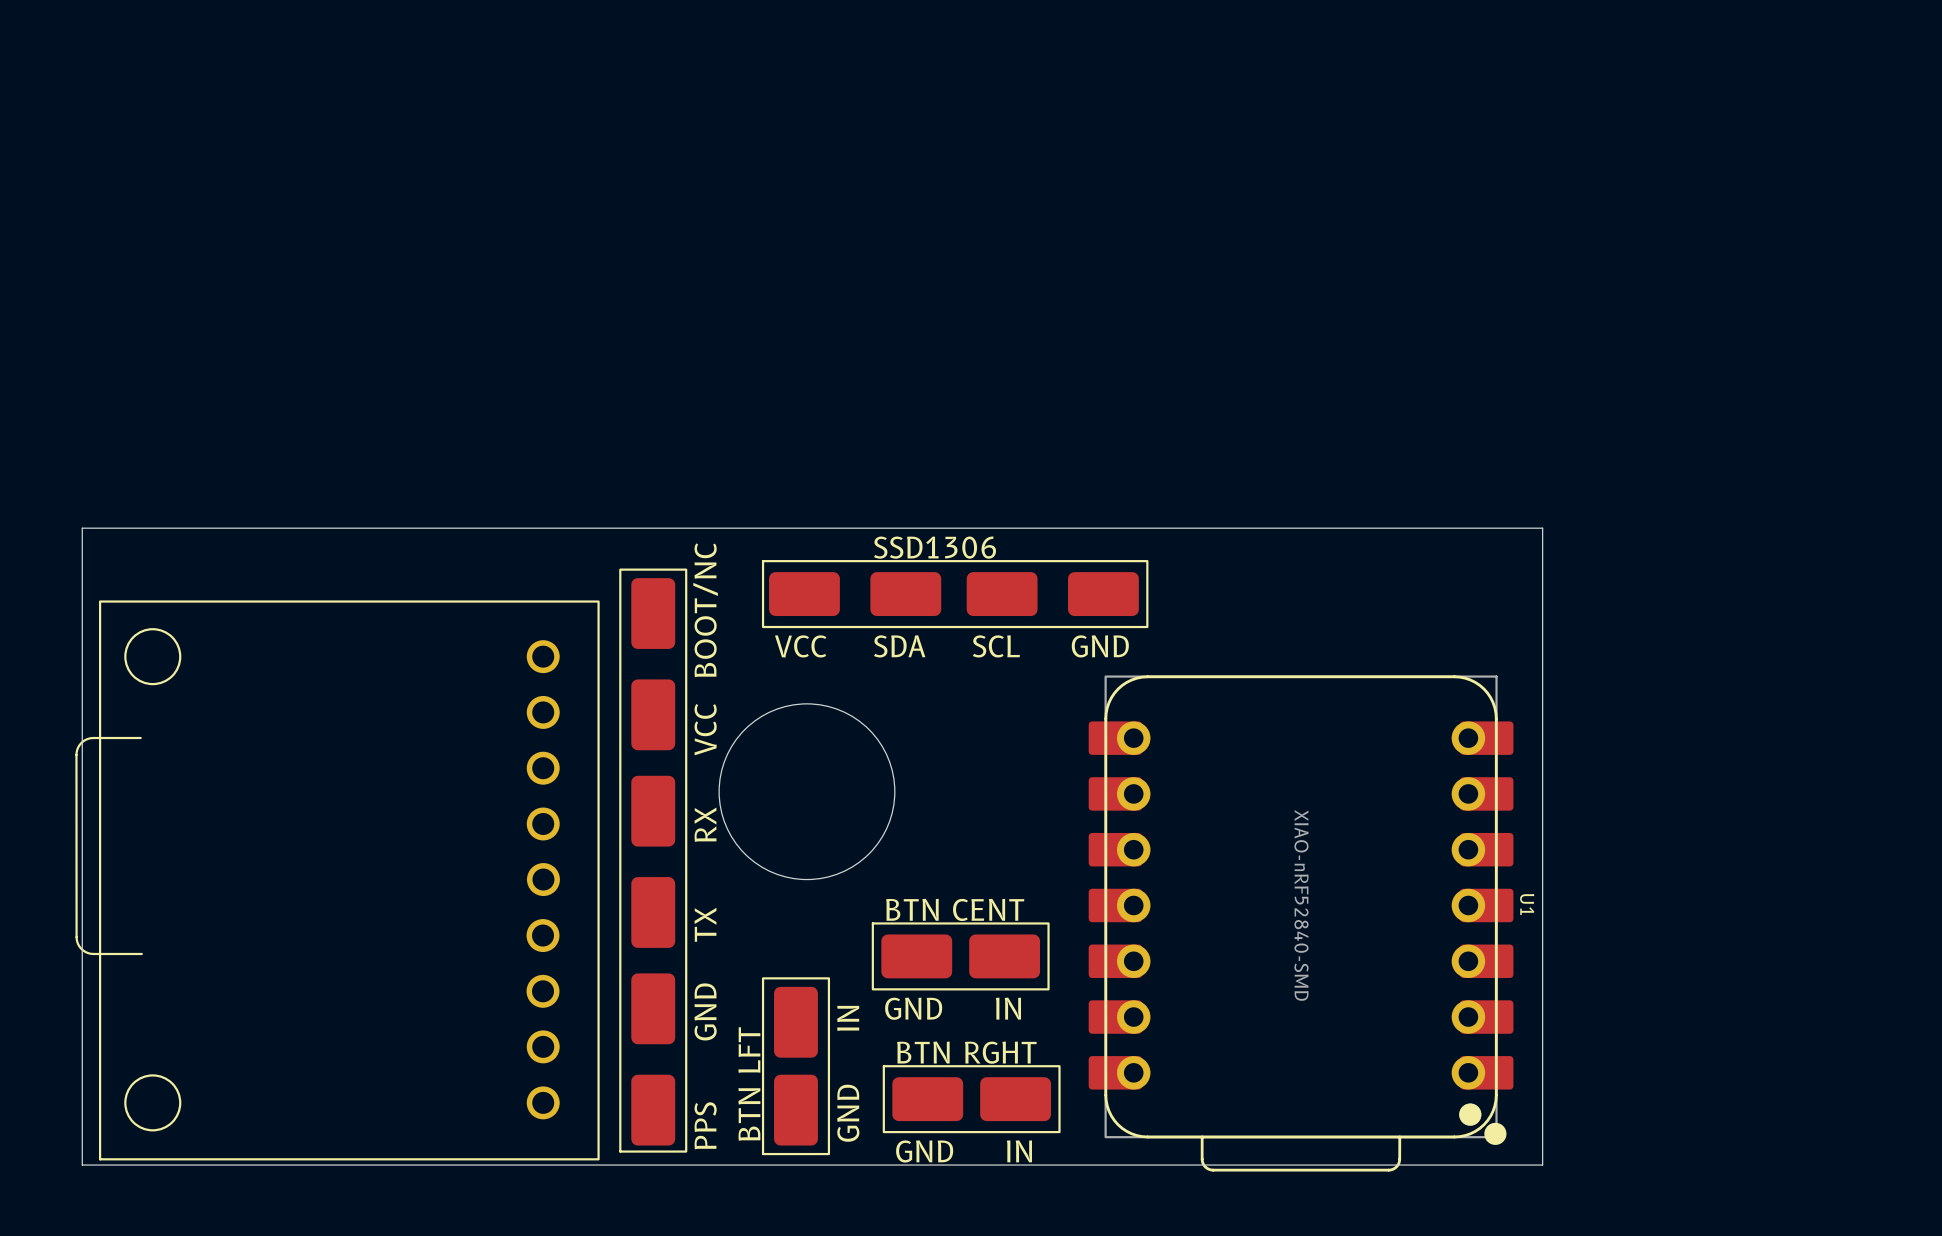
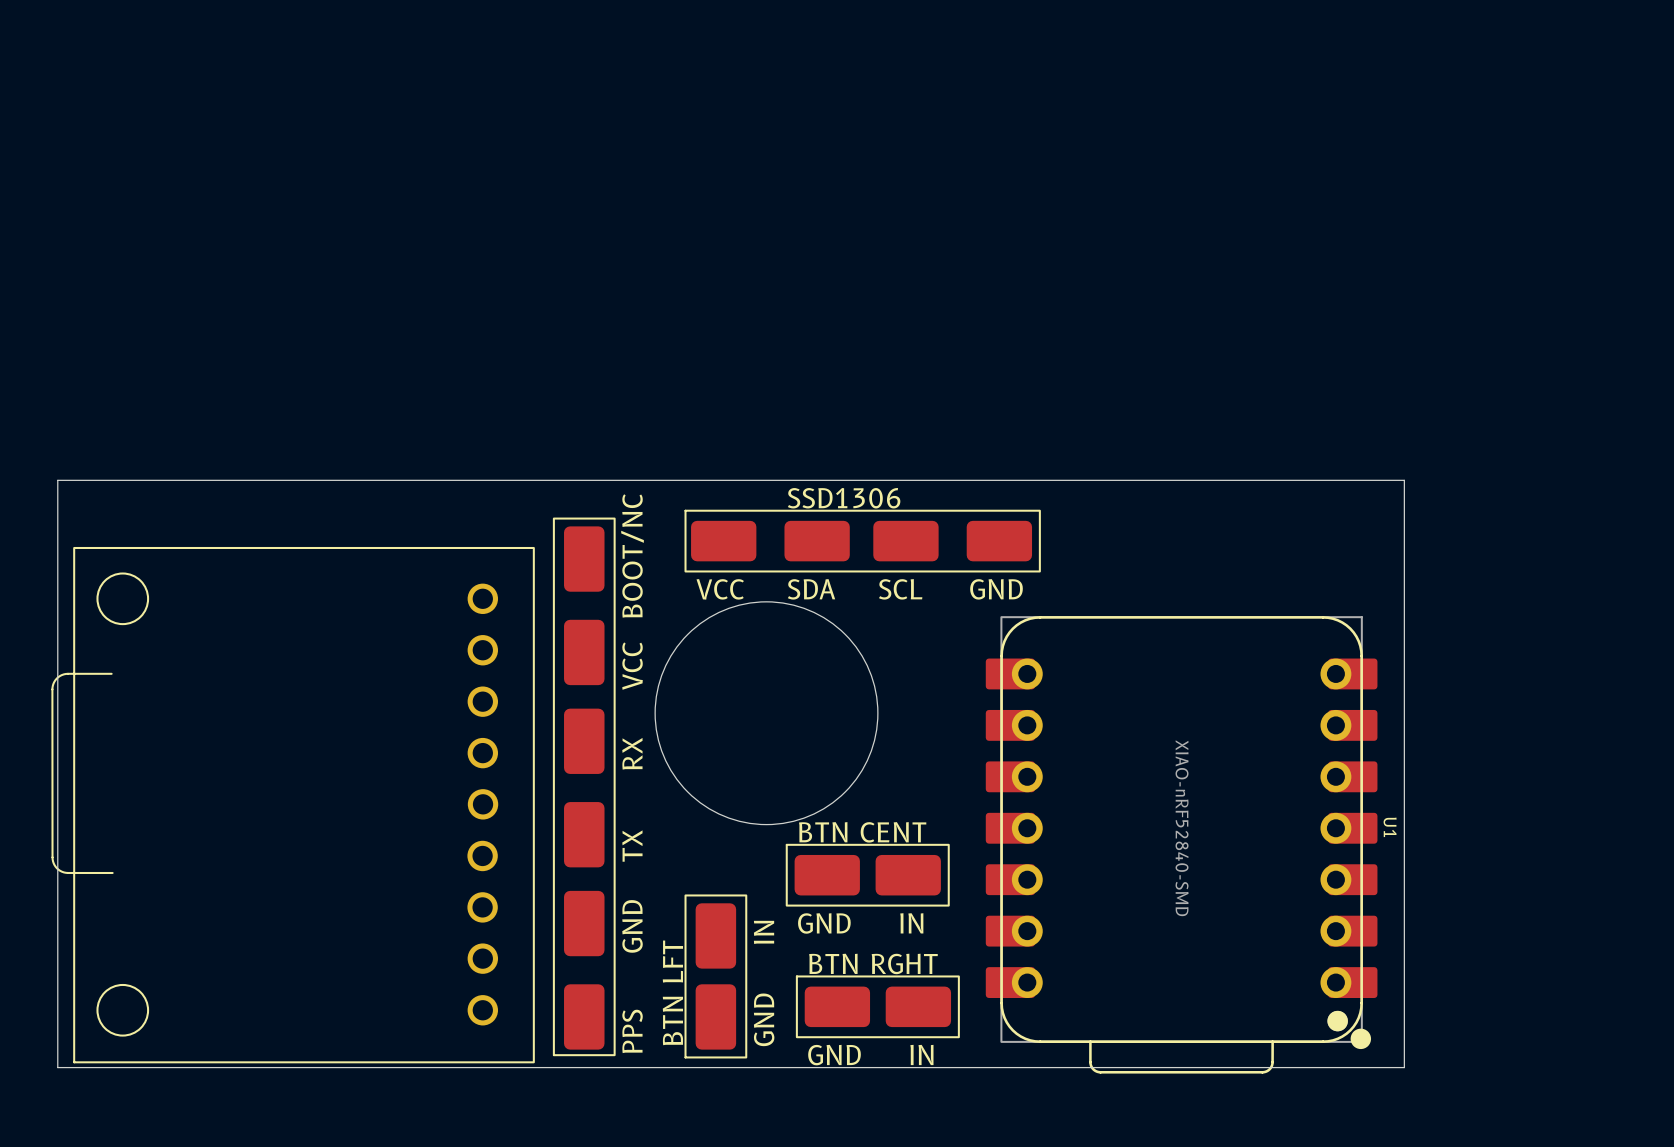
round board edge: none -> [654, 601, 879, 826]
round board edge: [718, 703, 896, 881] -> none

